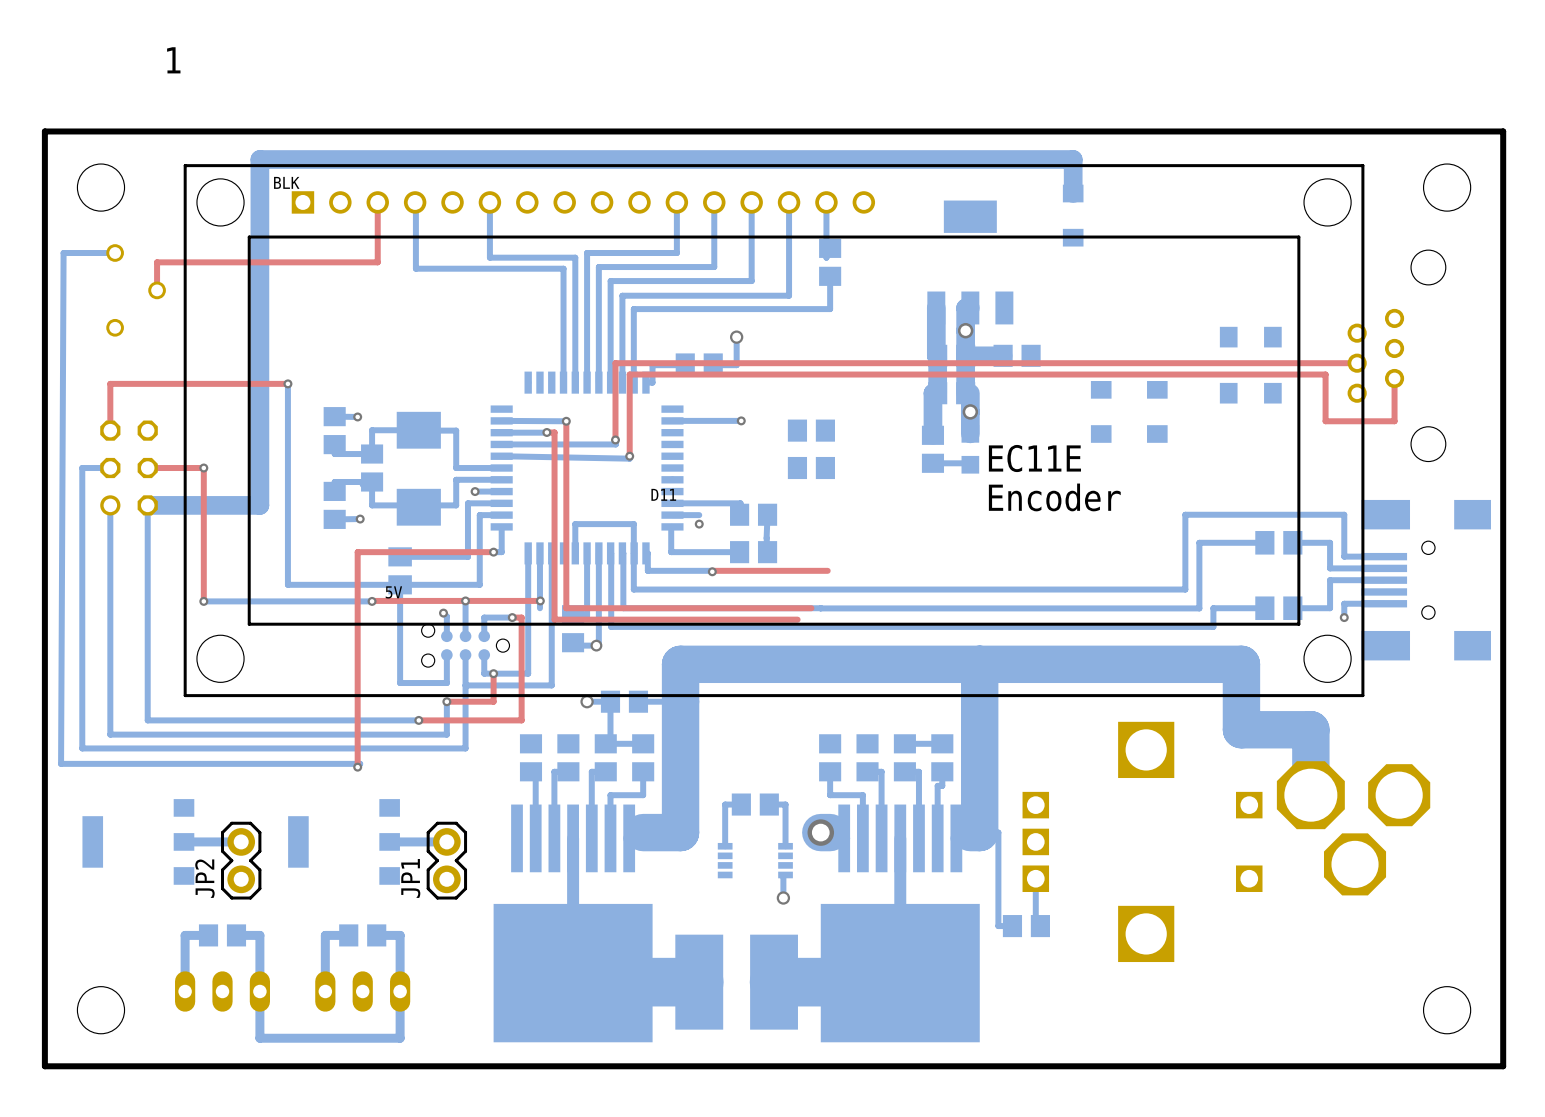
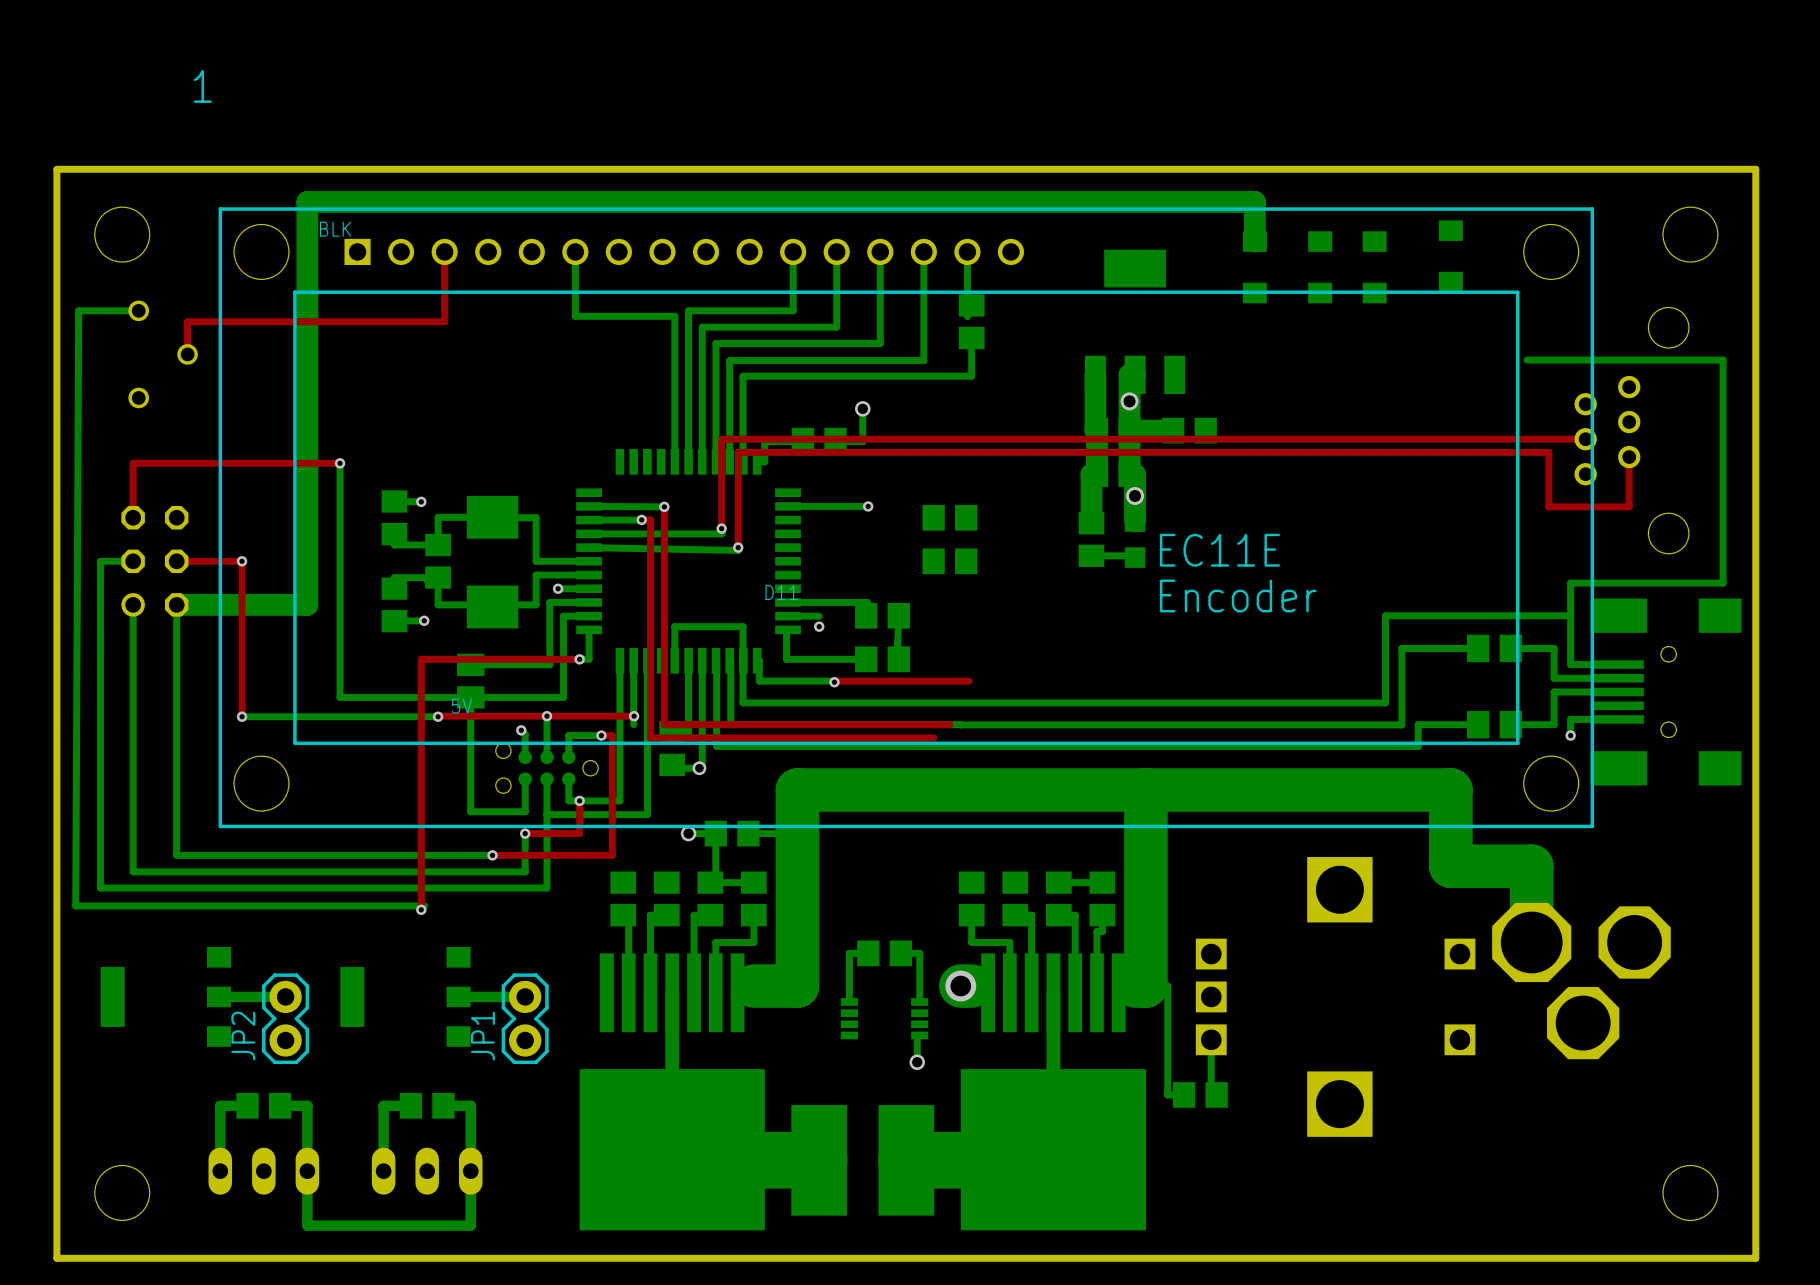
bottom track: (415, 202) (415, 268) (563, 268) (563, 382) -> none
part: none -> (1450, 256)
part: none -> (1320, 267)
part: none -> (1374, 267)
bottom track: none -> (1527, 360) (1723, 360) (1723, 583) (1570, 583) (1570, 615)
part: (1250, 337) -> none
part: (1250, 393) -> none
part: (1101, 411) -> none
part: (1157, 411) -> none

